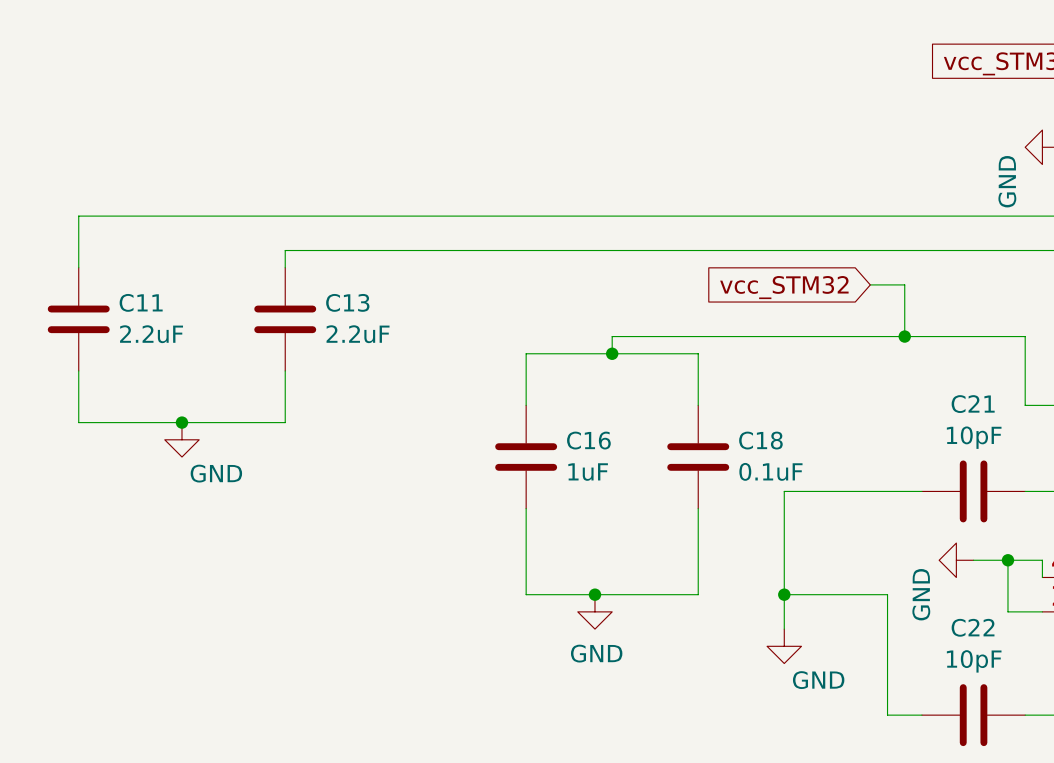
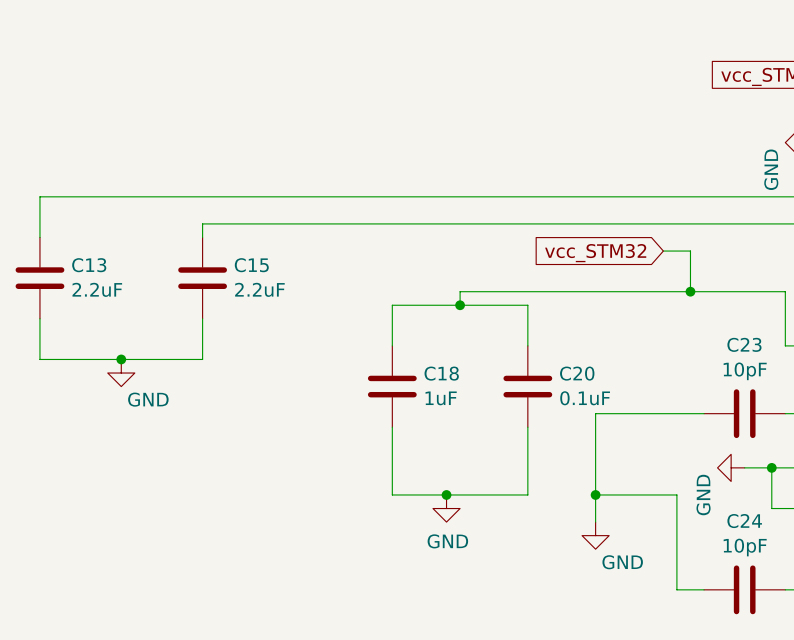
C11 name: C11 (141, 302) -> C13 (89, 265)
C13 name: C13 (347, 302) -> C15 (251, 265)
C21 name: C21 (973, 404) -> C23 (744, 344)
C16 name: C16 (588, 440) -> C18 (441, 373)
C18 name: C18 (760, 440) -> C20 (577, 373)
C22 name: C22 (973, 627) -> C24 (744, 521)

